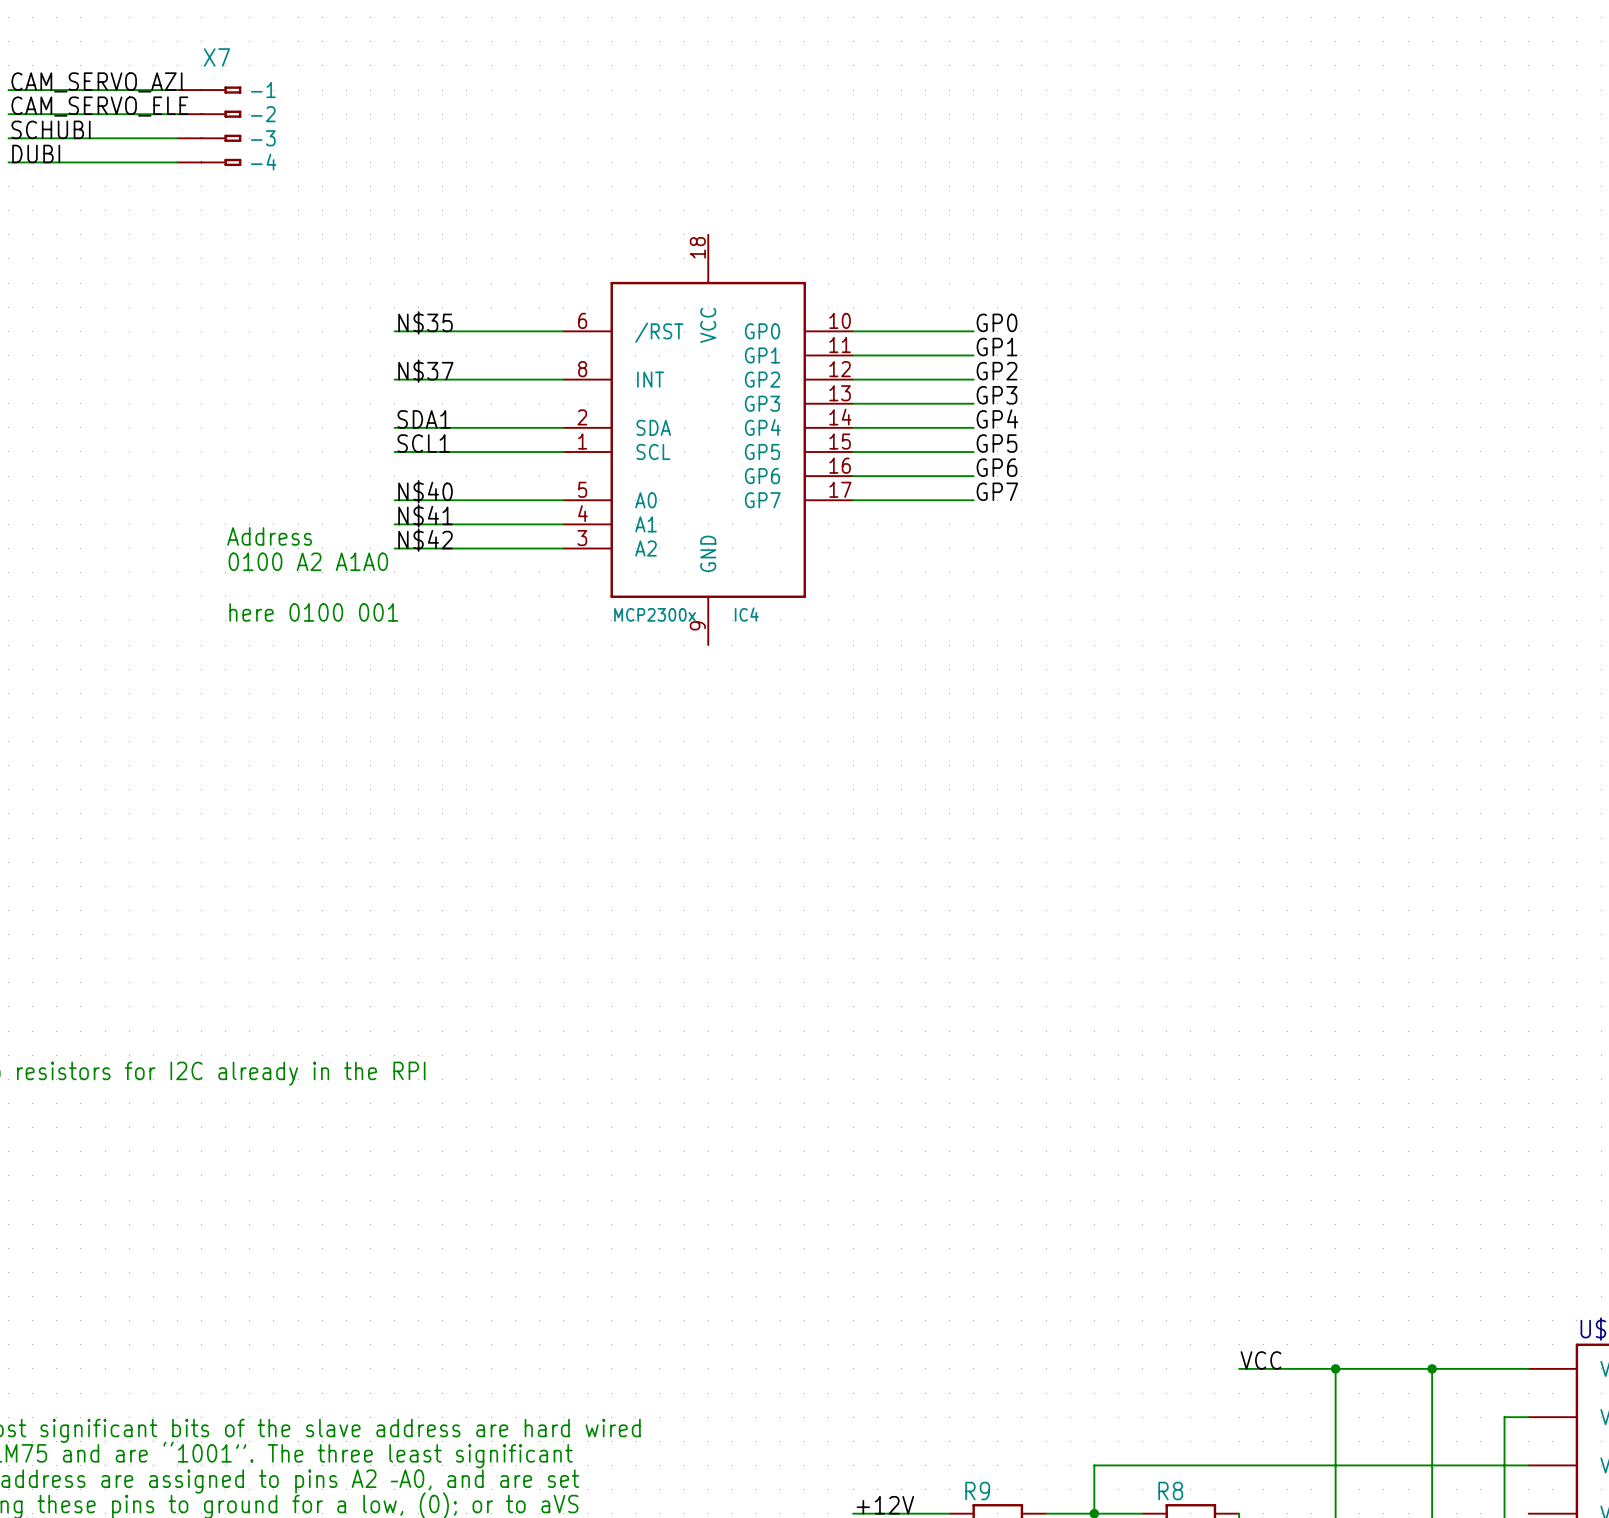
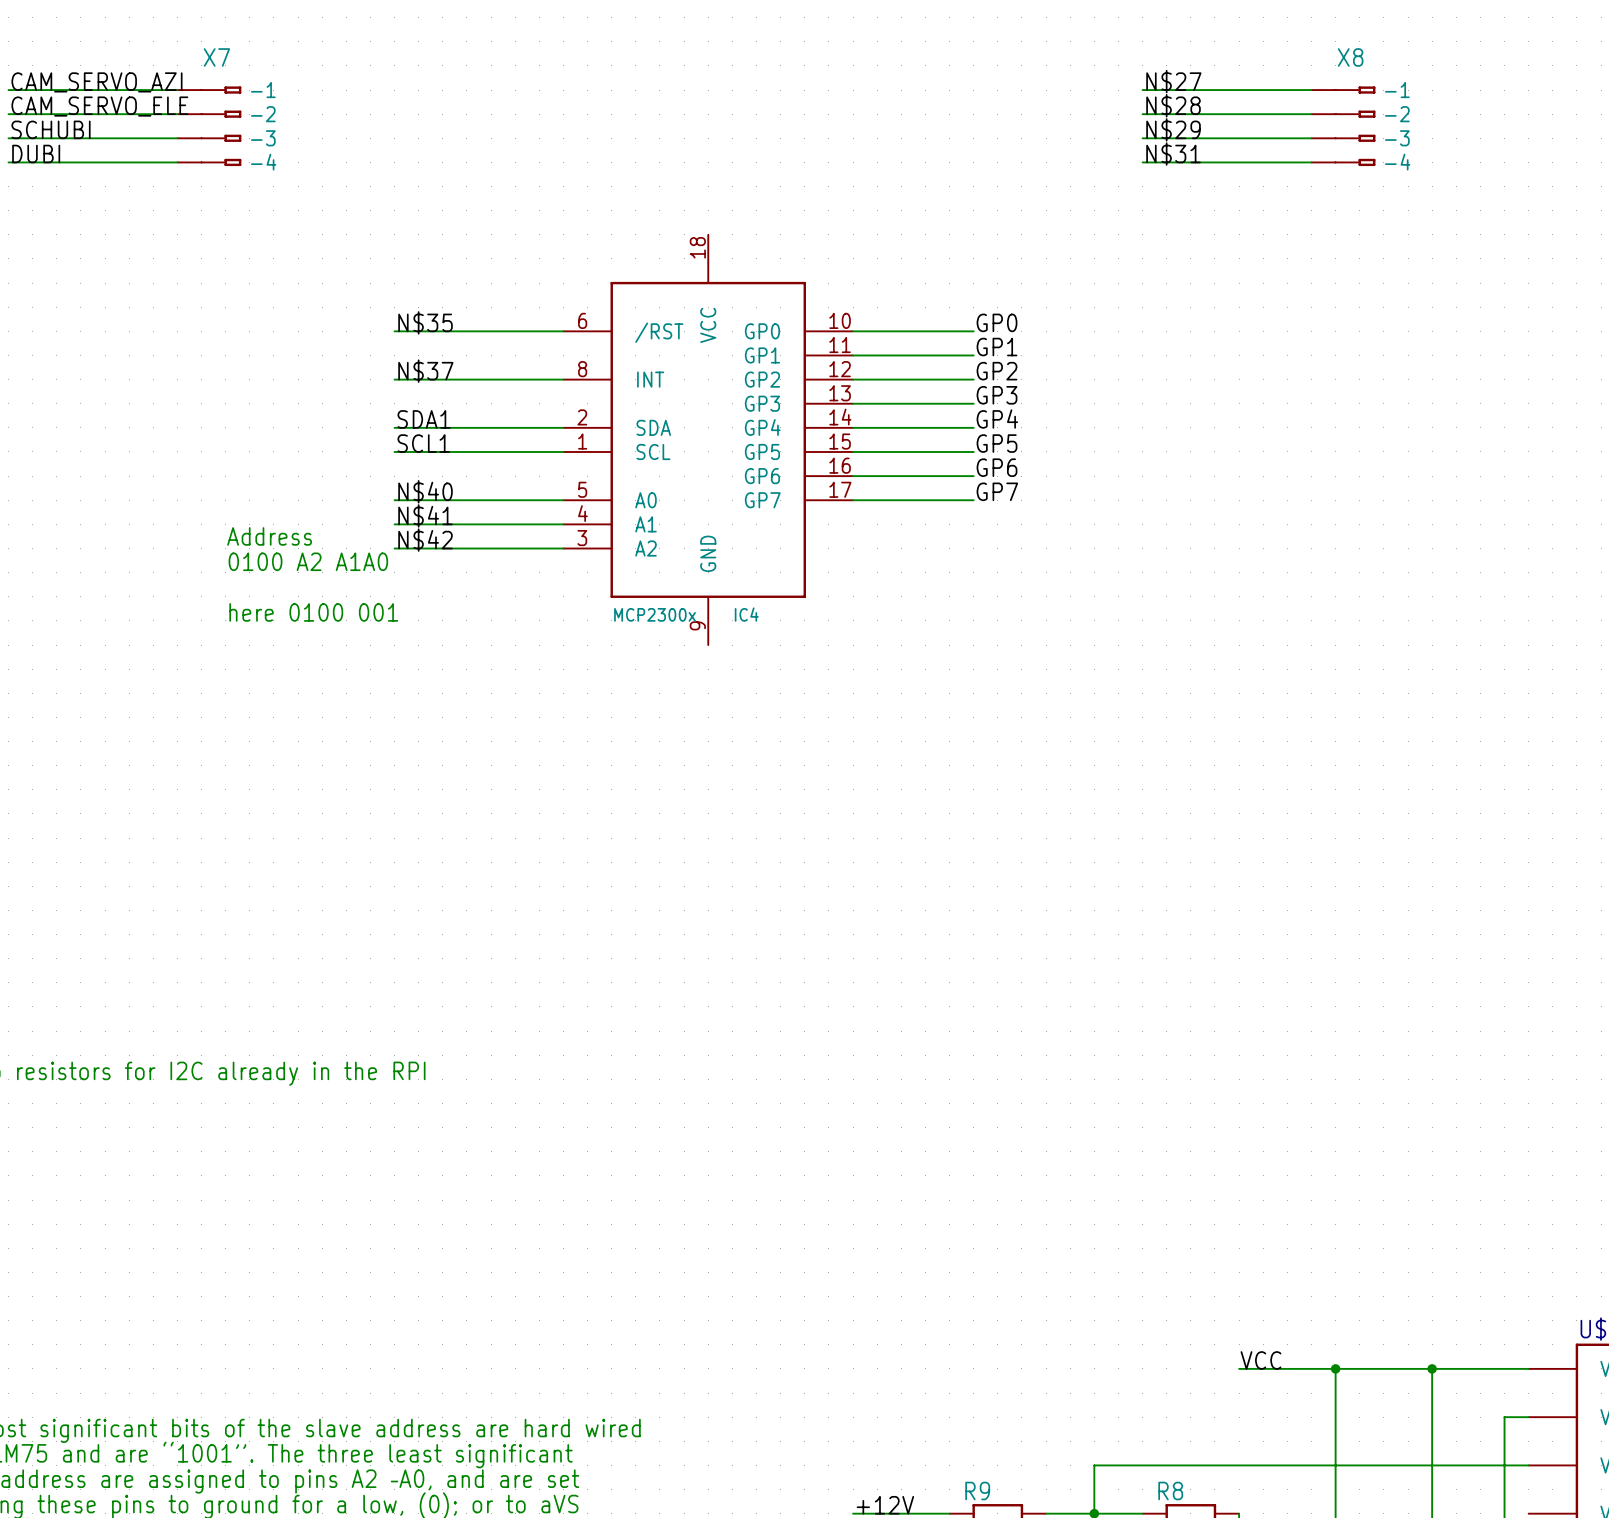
label: none -> N$27 (1173, 81)
wire: none -> (1142, 90) (1311, 90)
label: none -> N$28 (1173, 105)
wire: none -> (1142, 114) (1311, 114)
X8: none -> (1343, 126)
label: none -> N$29 (1173, 129)
wire: none -> (1142, 138) (1311, 138)
label: none -> N$31 (1173, 153)
wire: none -> (1142, 162) (1311, 162)

